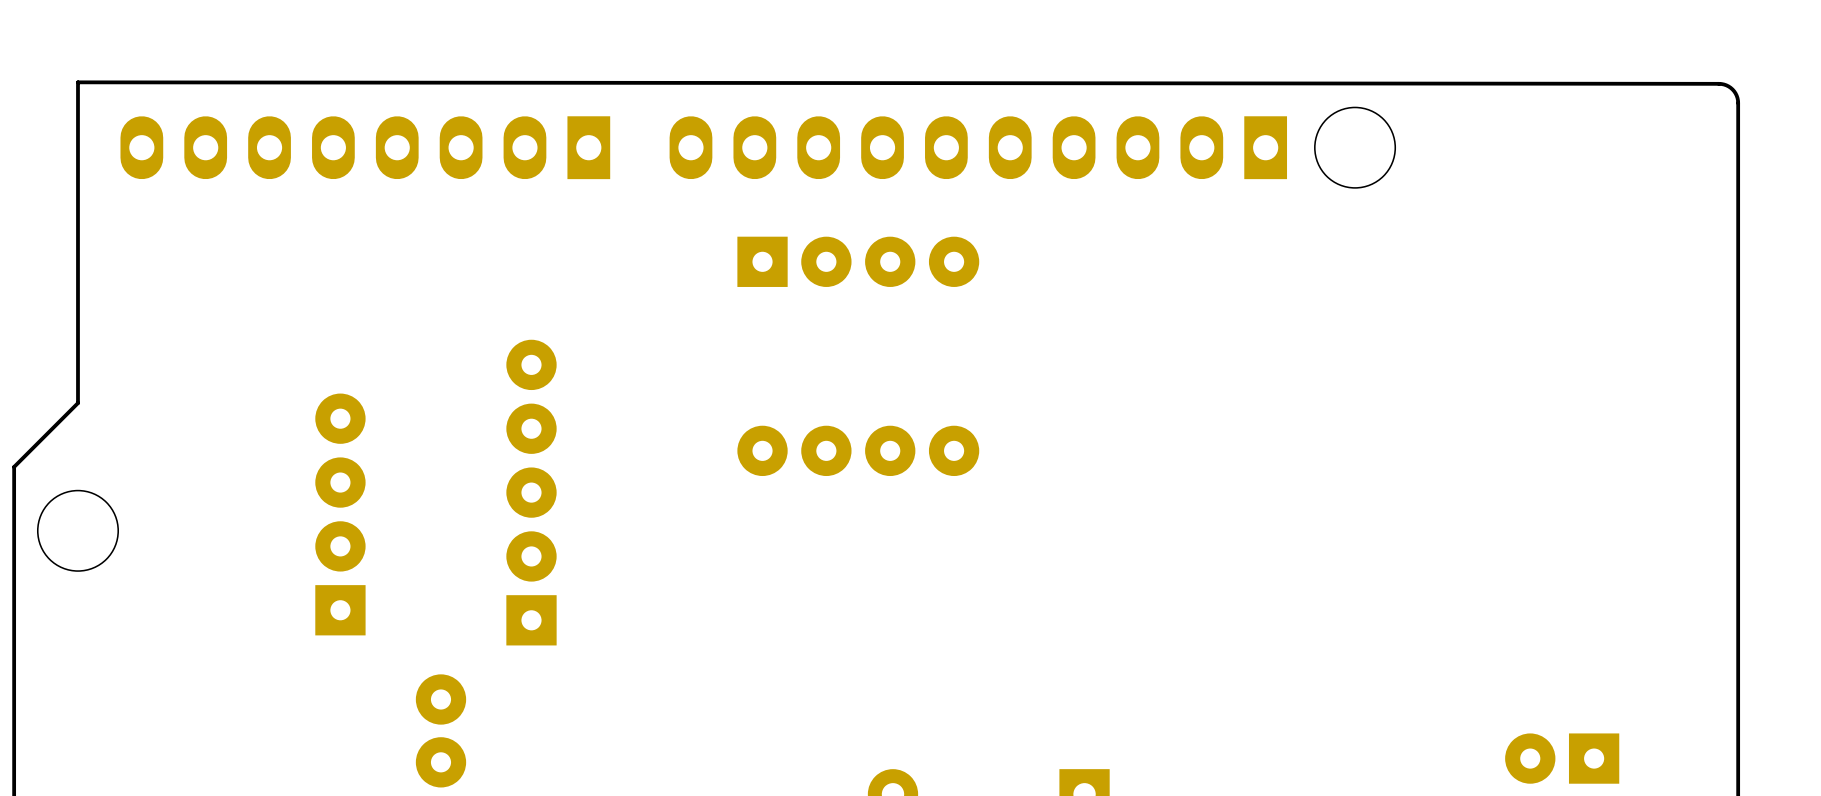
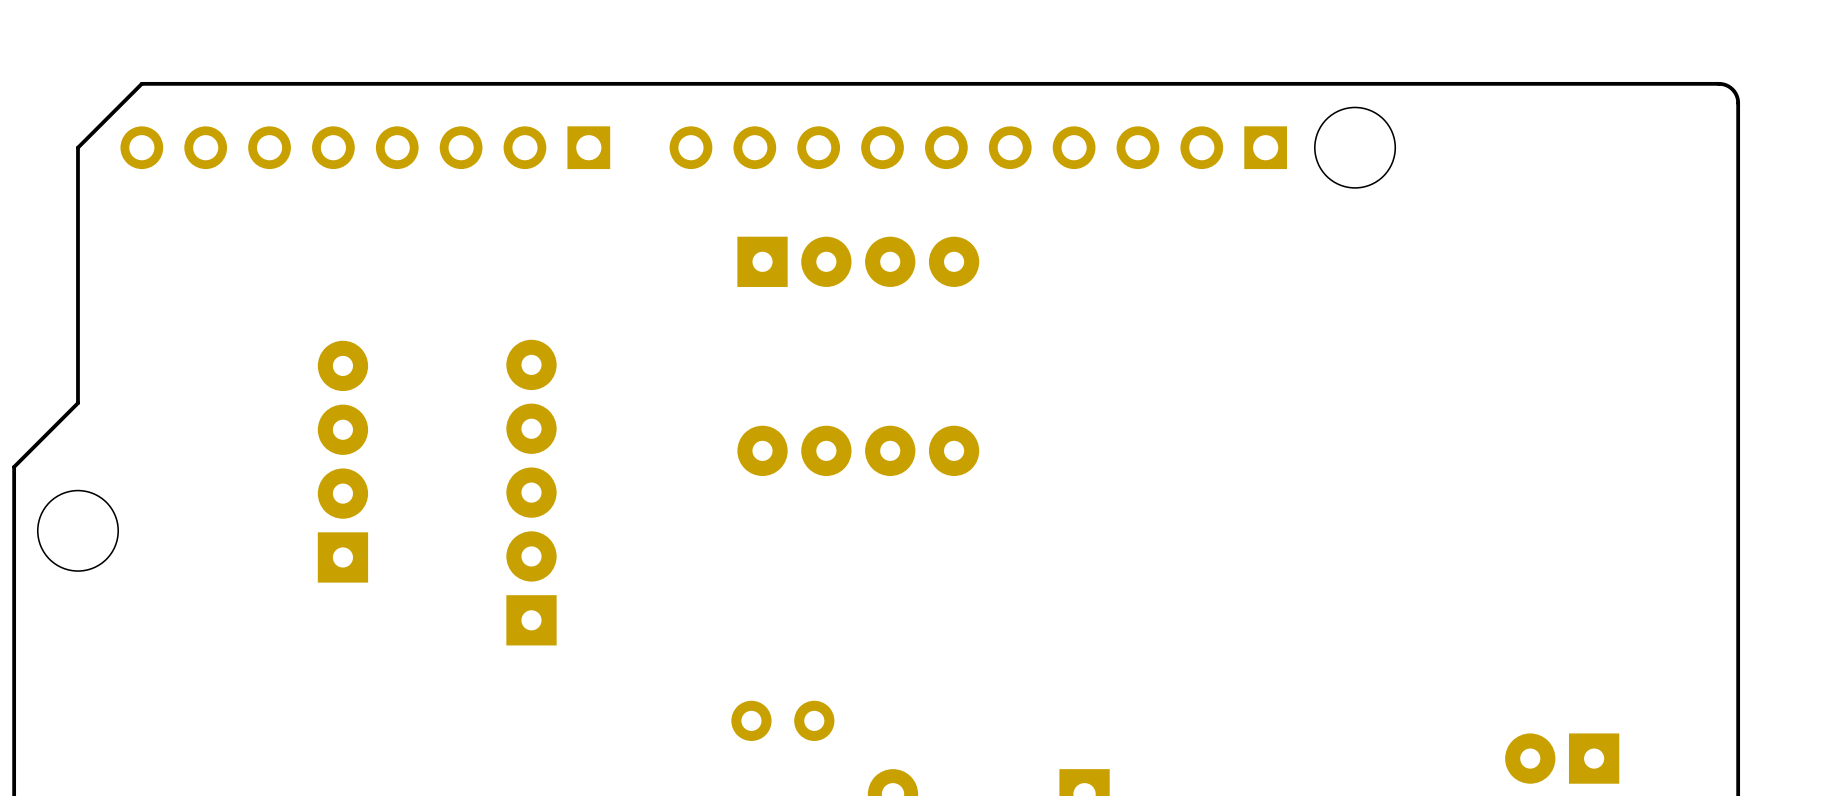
board edge: (1719, 83) (77, 82) (77, 147) -> (1719, 83) (141, 83) (77, 147)
part footprint: [120, 116, 611, 180] -> [120, 126, 611, 170]
part footprint: [669, 116, 1288, 180] -> [669, 126, 1288, 170]
part position: (340, 514) -> (342, 461)
part: none -> (782, 720)
part: (440, 730) -> none

